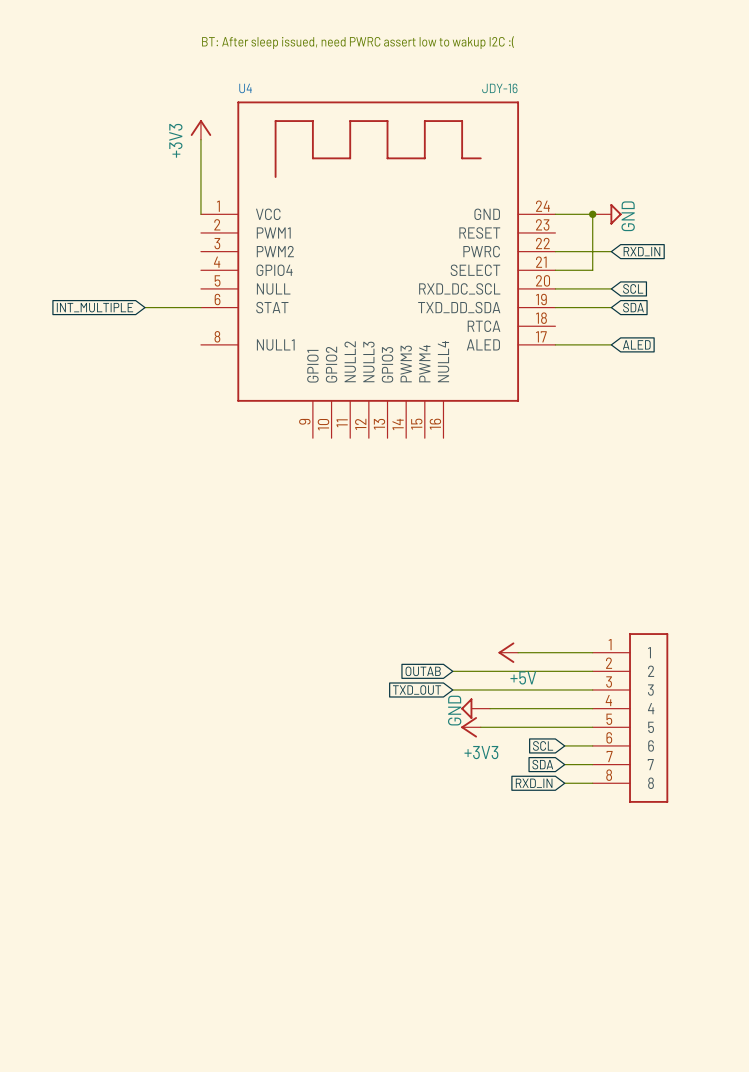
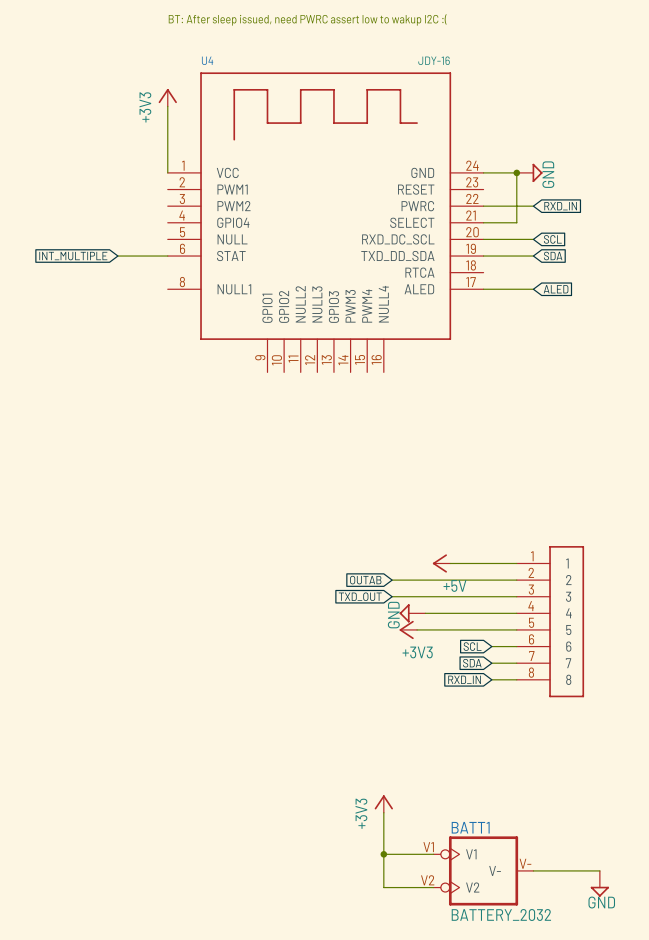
power symbol: none -> +3V3 (383, 804)
wire: none -> (383, 812) (383, 887) (433, 887)
wire: none -> (383, 854) (433, 854)
junction: none -> (383, 854)
BATT1: none -> BATTERY_2032 (483, 870)
wire: none -> (533, 870) (599, 870)
power symbol: none -> GND (599, 883)

